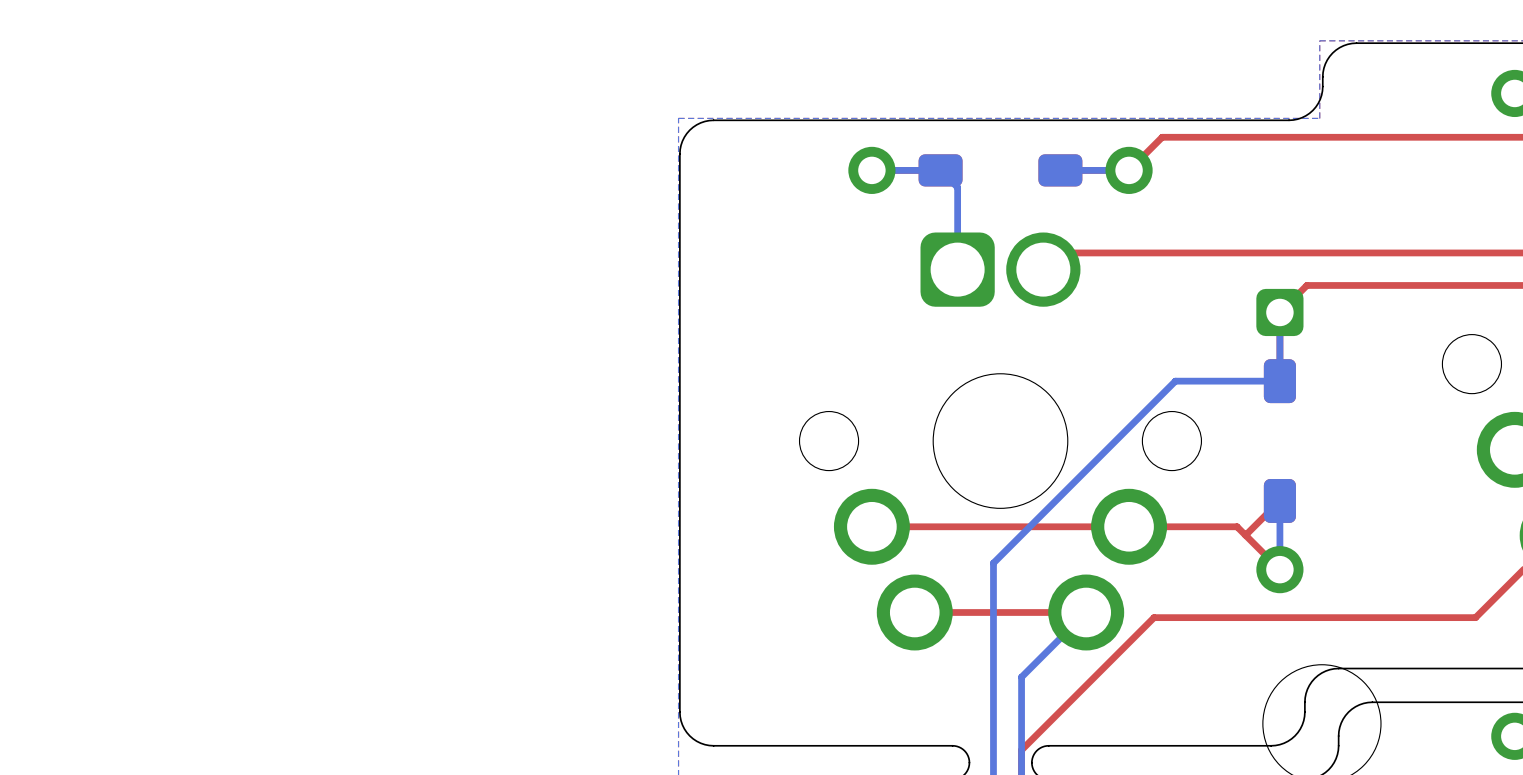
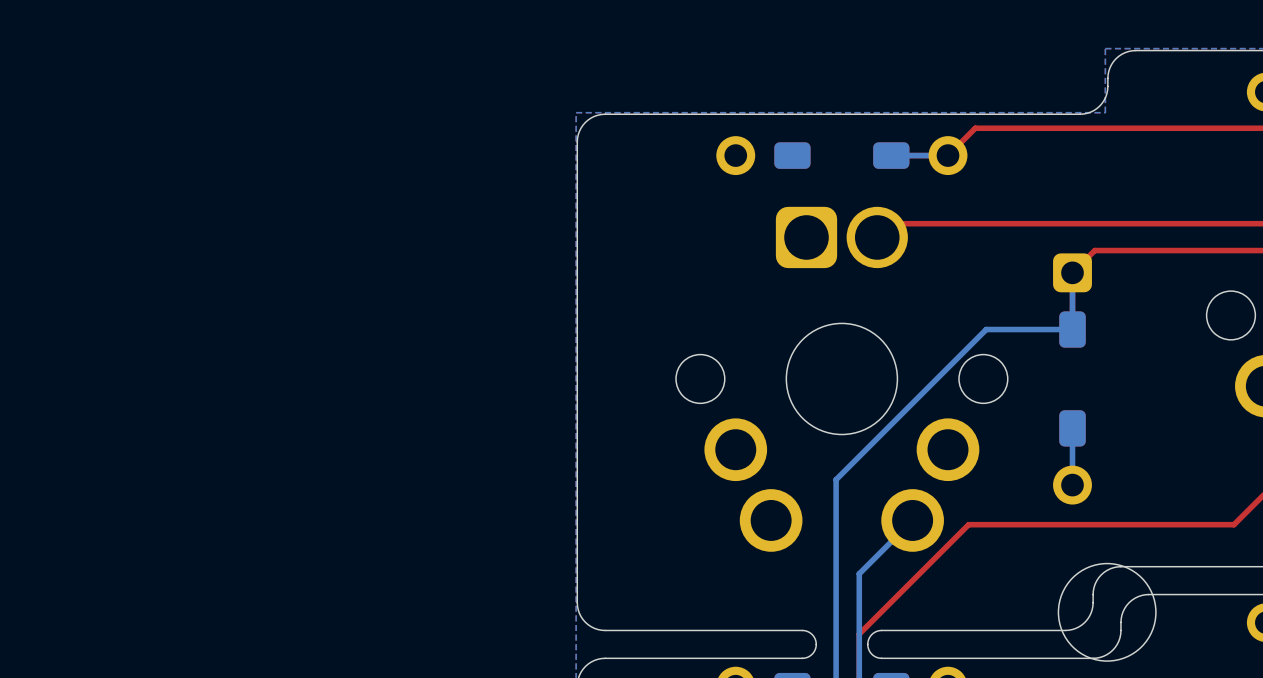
bottom track: (871, 170) (940, 170) (957, 187) (957, 269) -> none
top track: (1279, 500) (1245, 535) -> none
top track: (871, 526) (1237, 526) (1279, 569) -> none
top track: (1086, 612) (914, 612) -> none

